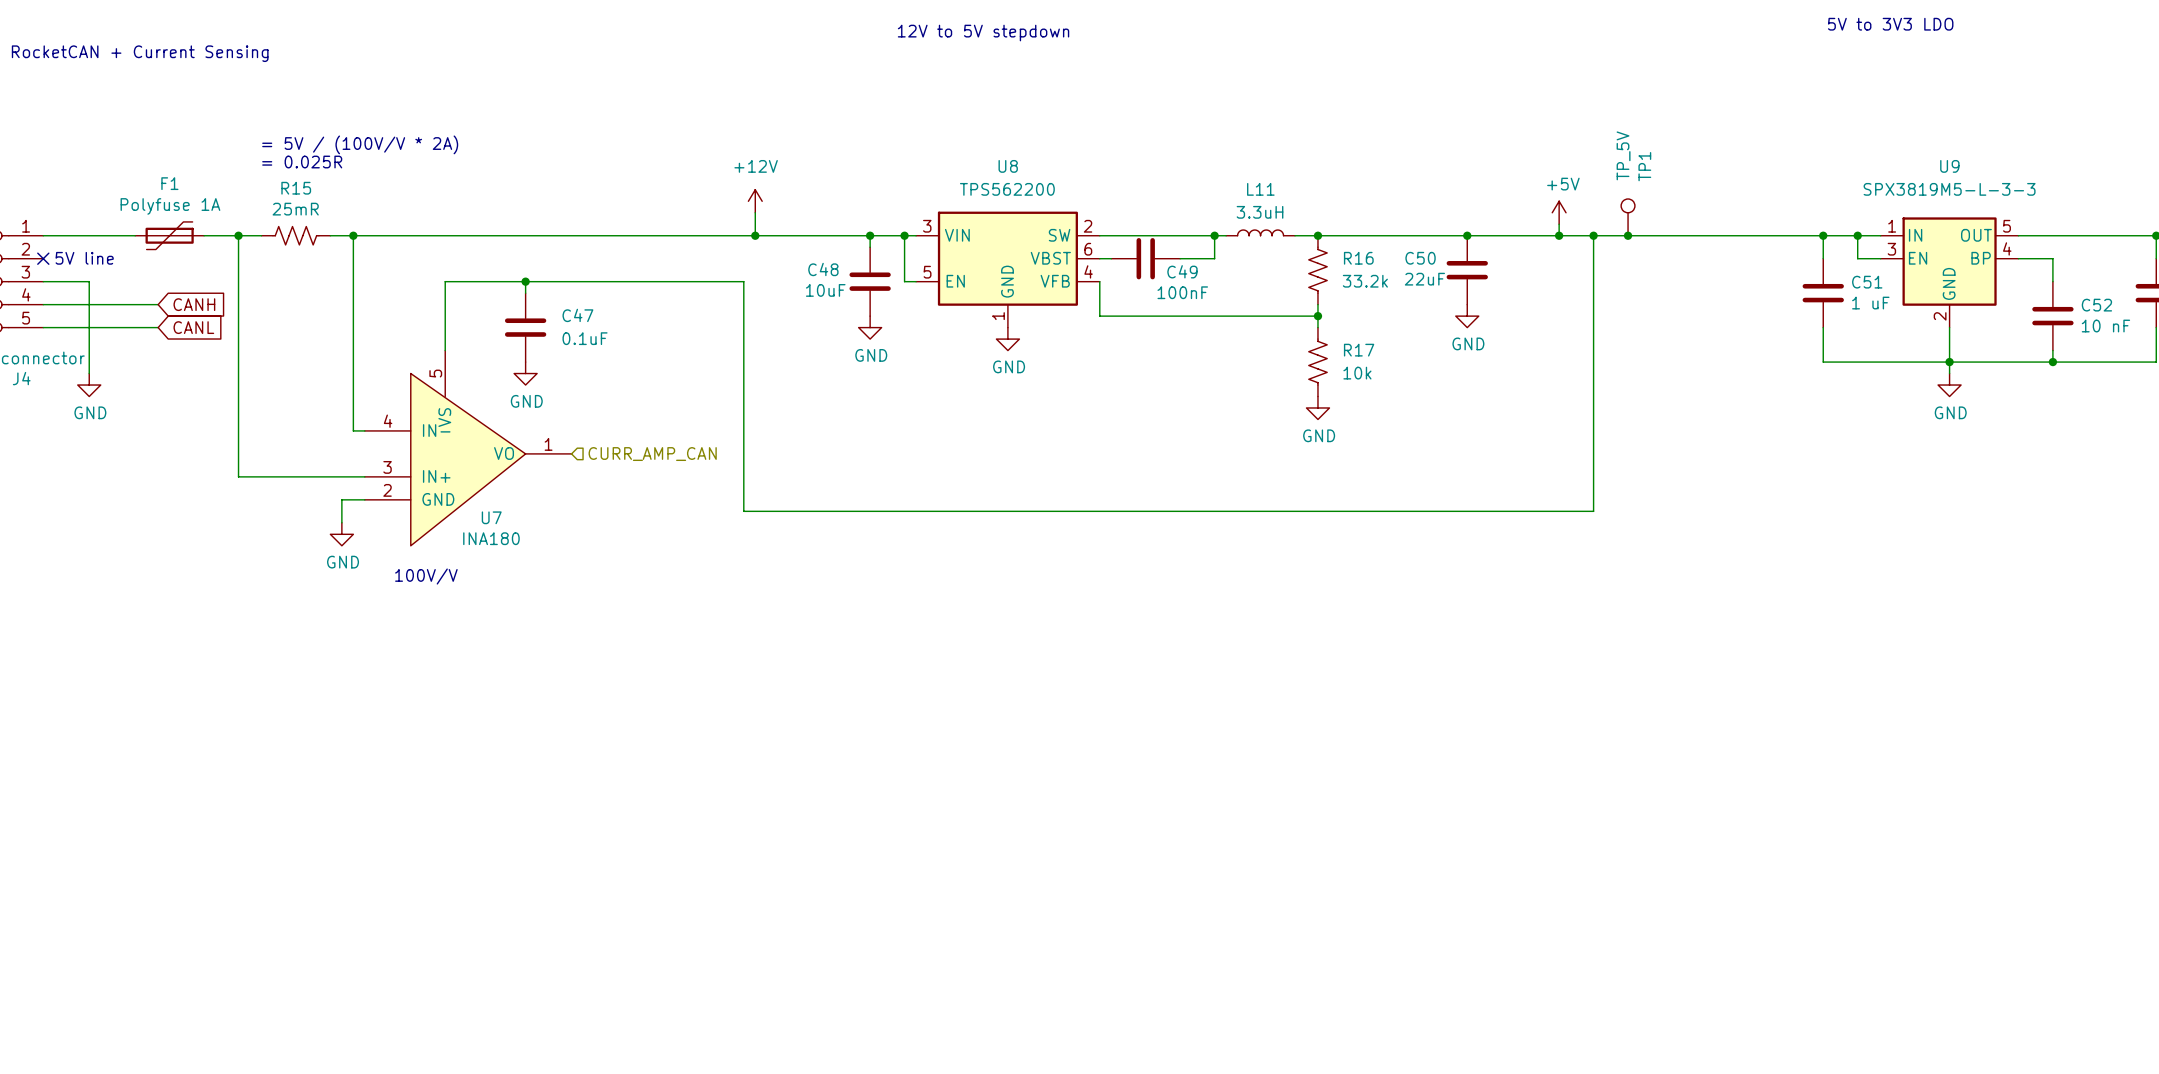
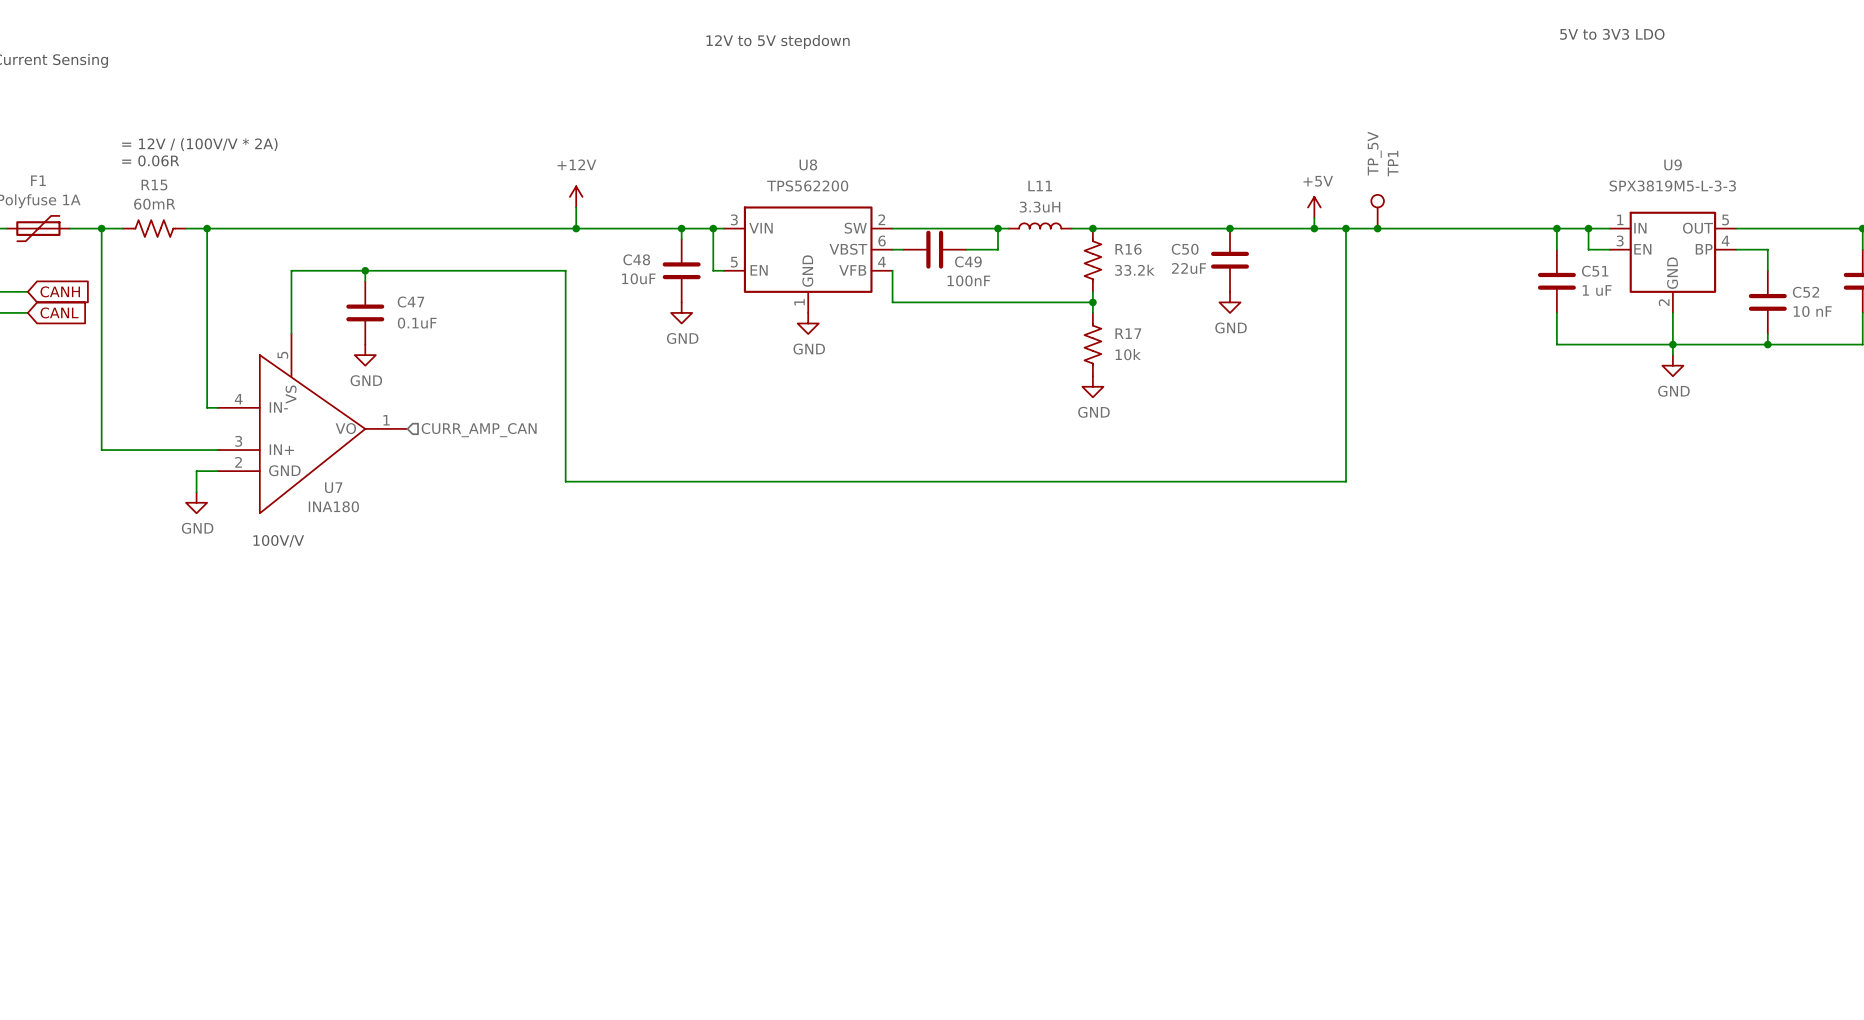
text: = 5V / (100V/V * 2A) (360, 144) -> = 12V / (100V/V * 2A) (199, 144)
text: = 0.025R (302, 162) -> = 0.06R (150, 160)
R15 value: 25mR (295, 209) -> 60mR (154, 204)

